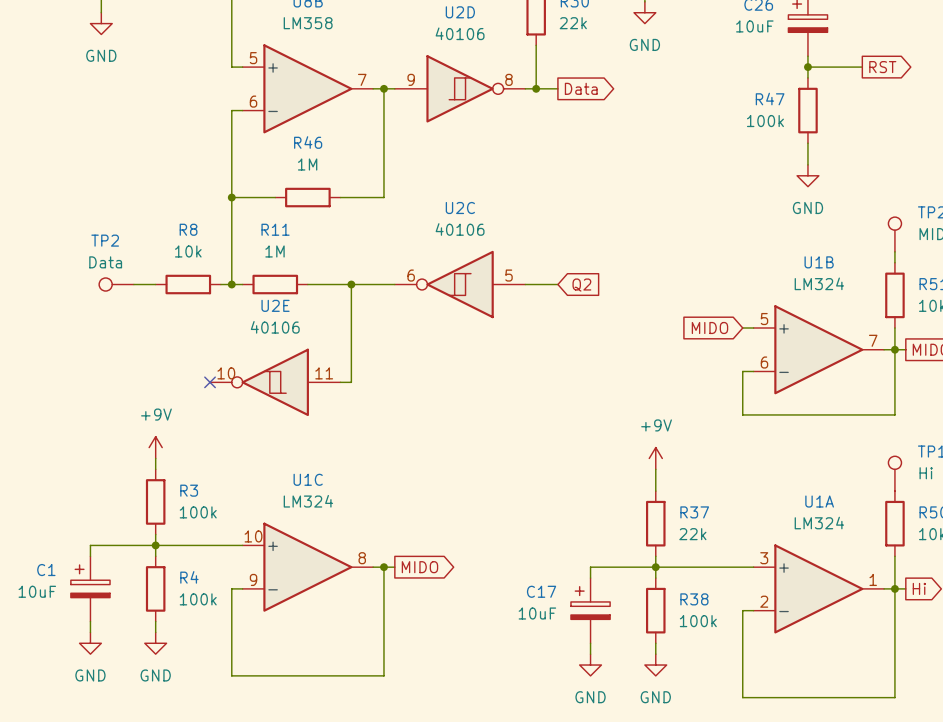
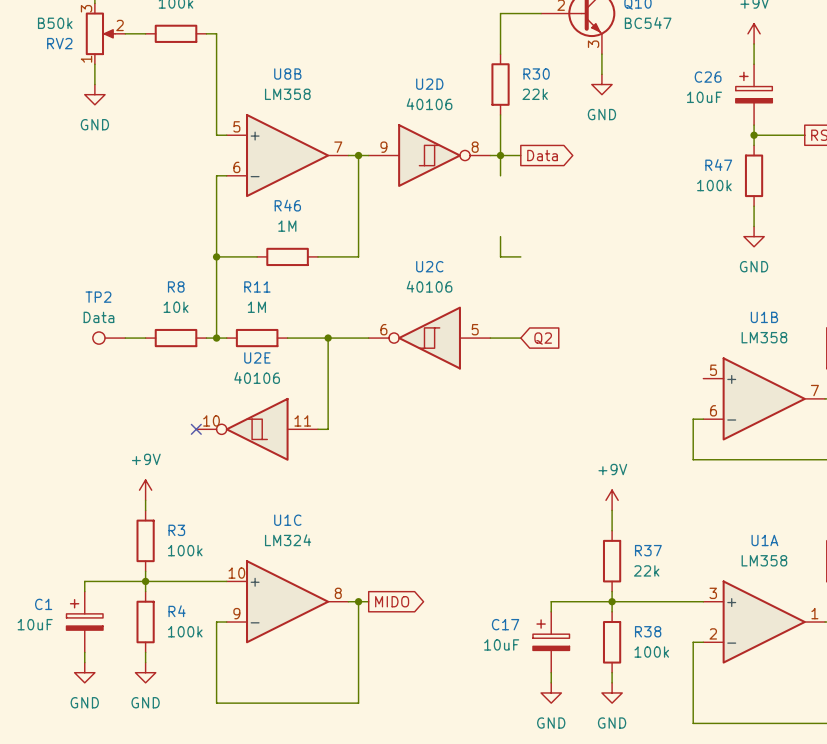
wire: none -> (500, 155) (500, 175)
wire: none -> (500, 236) (500, 256) (520, 256)
U1B value: LM324 (819, 283) -> LM358 (764, 337)
global label: MIDO (709, 328) -> none
wire: (742, 328) (753, 328) -> none
U1A value: LM324 (819, 523) -> LM358 (764, 560)

